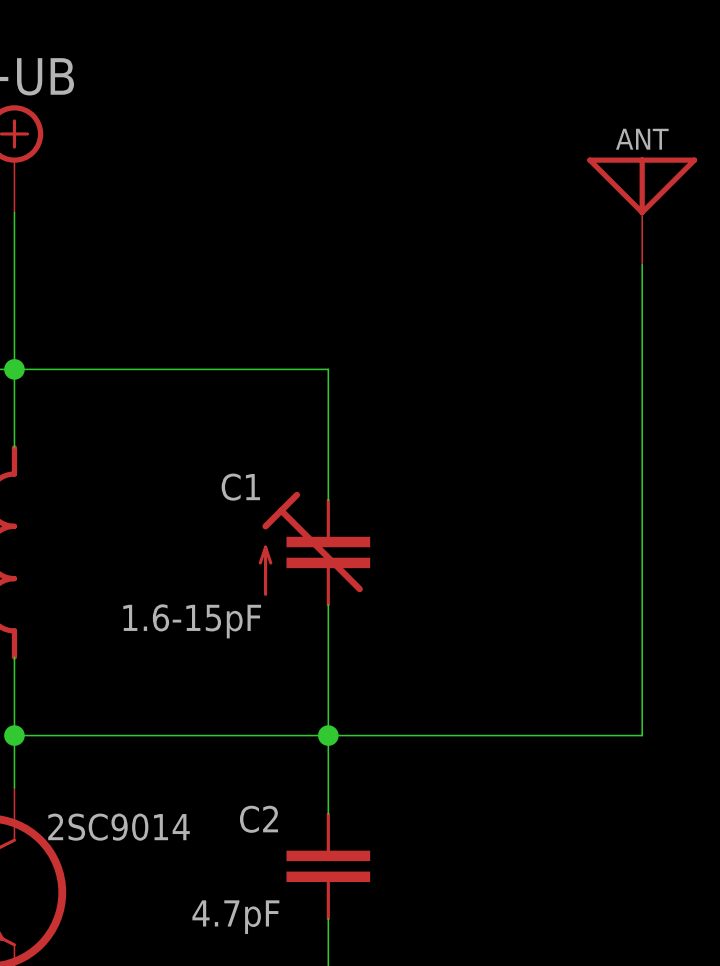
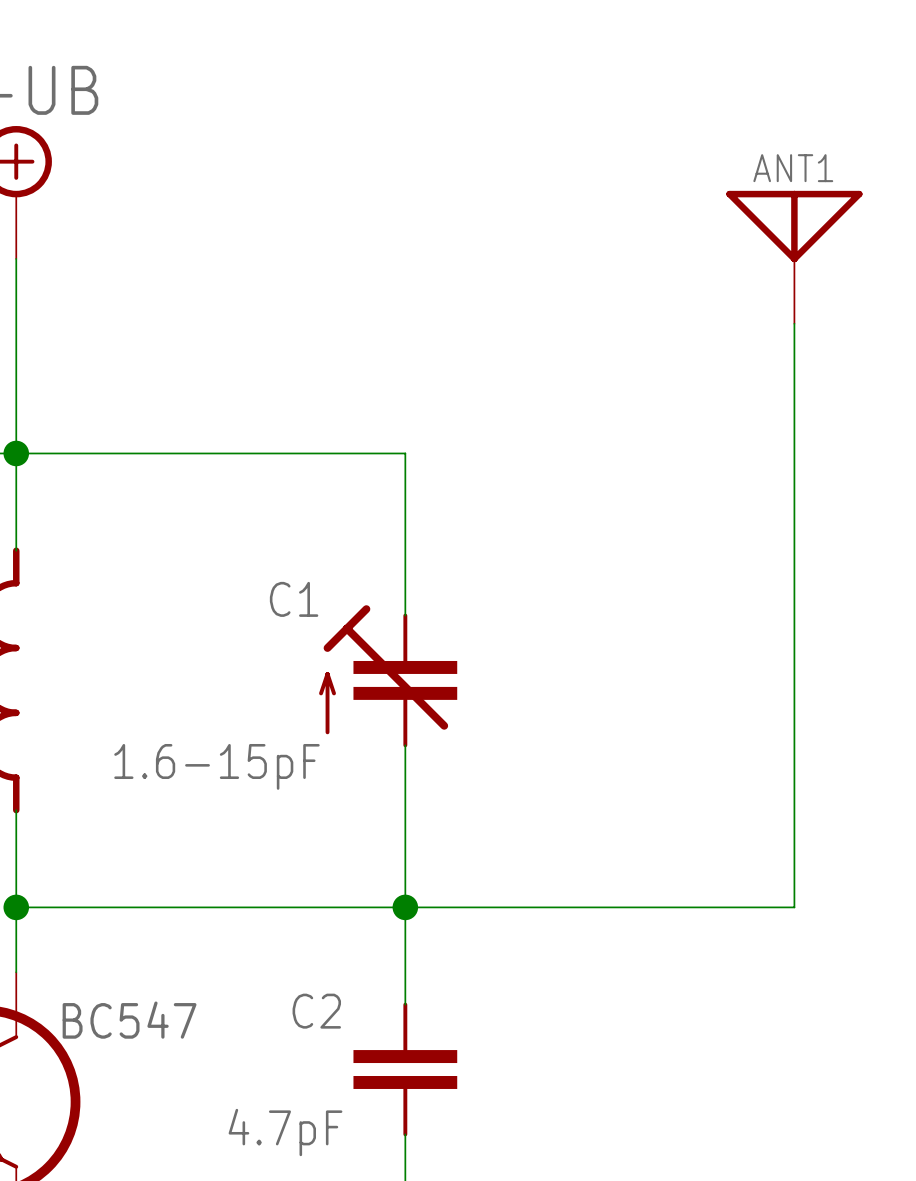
ANT name: ANT (642, 139) -> ANT1 (793, 168)
part value: 2SC9014 (118, 827) -> BC547 (129, 1020)

